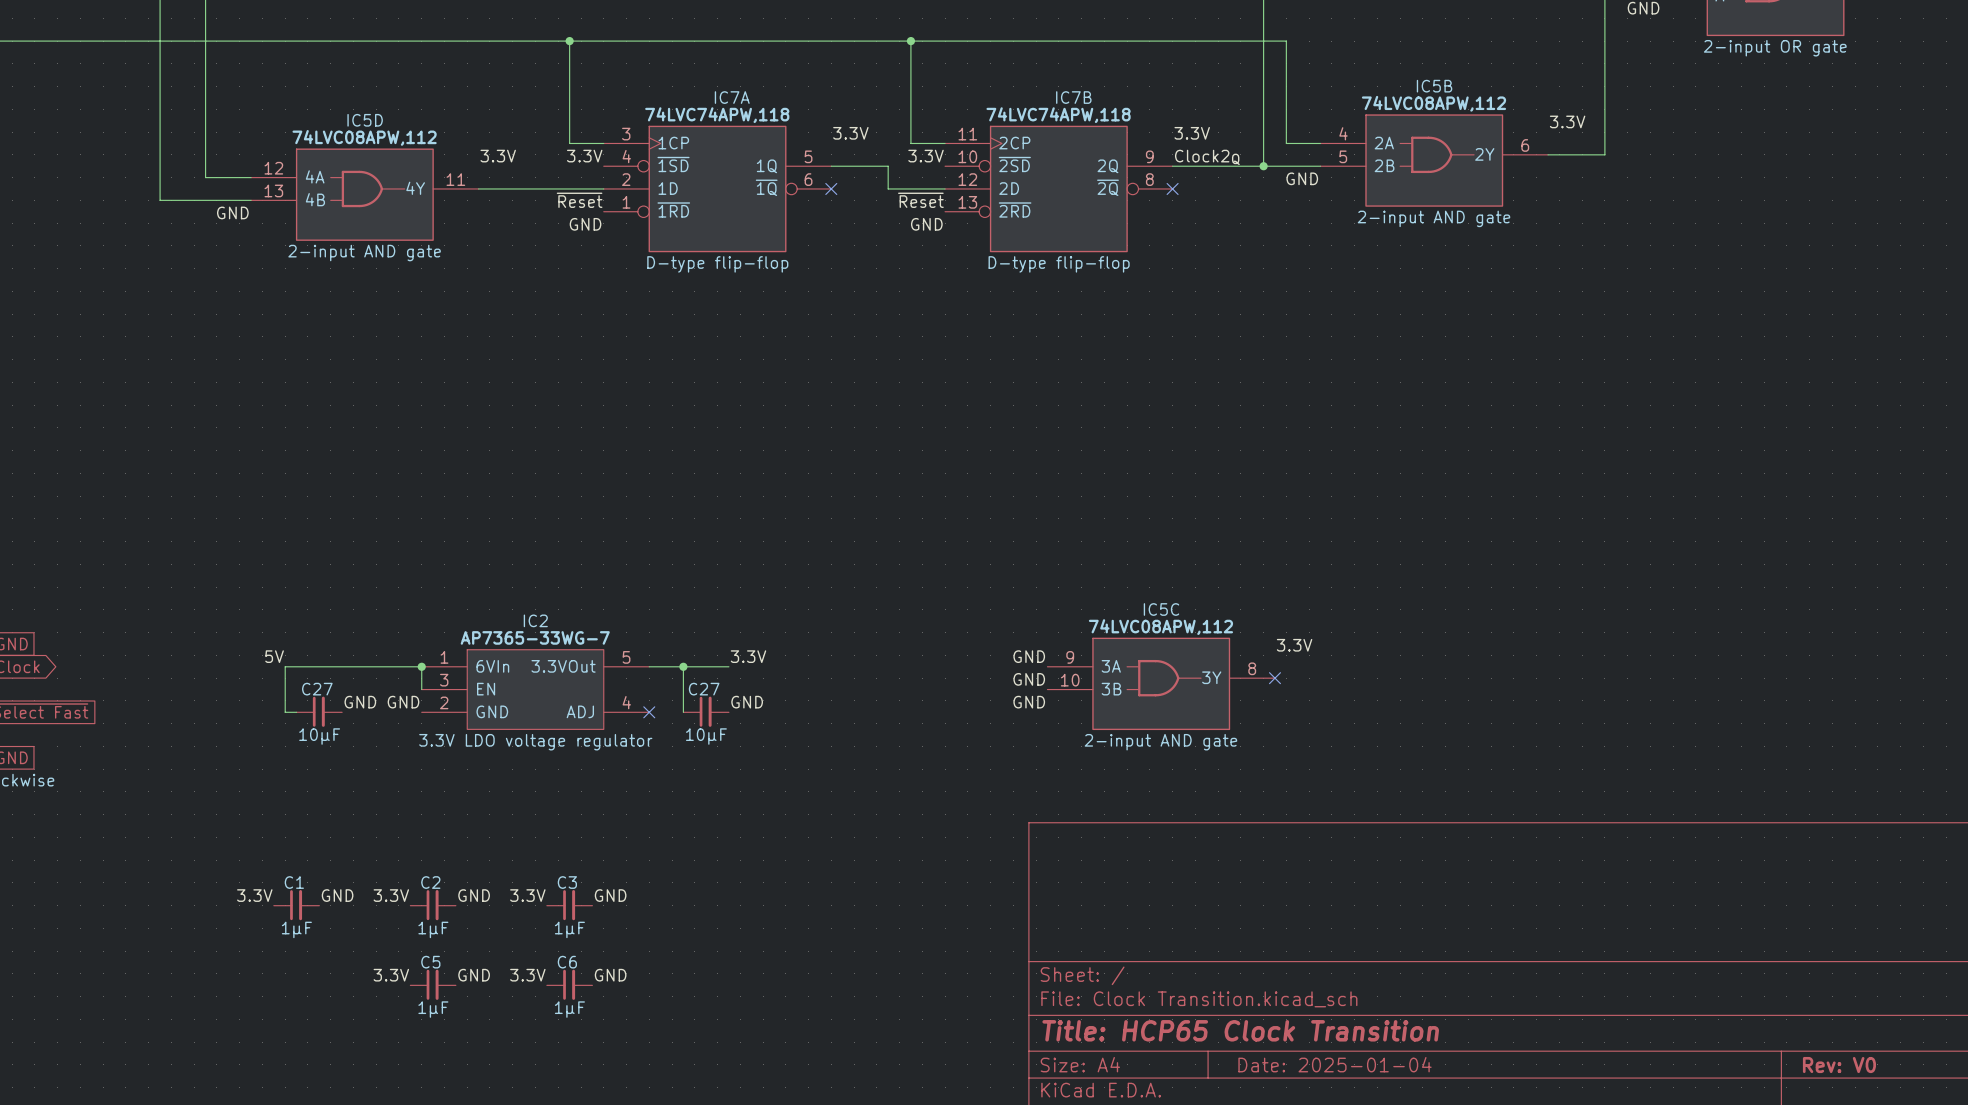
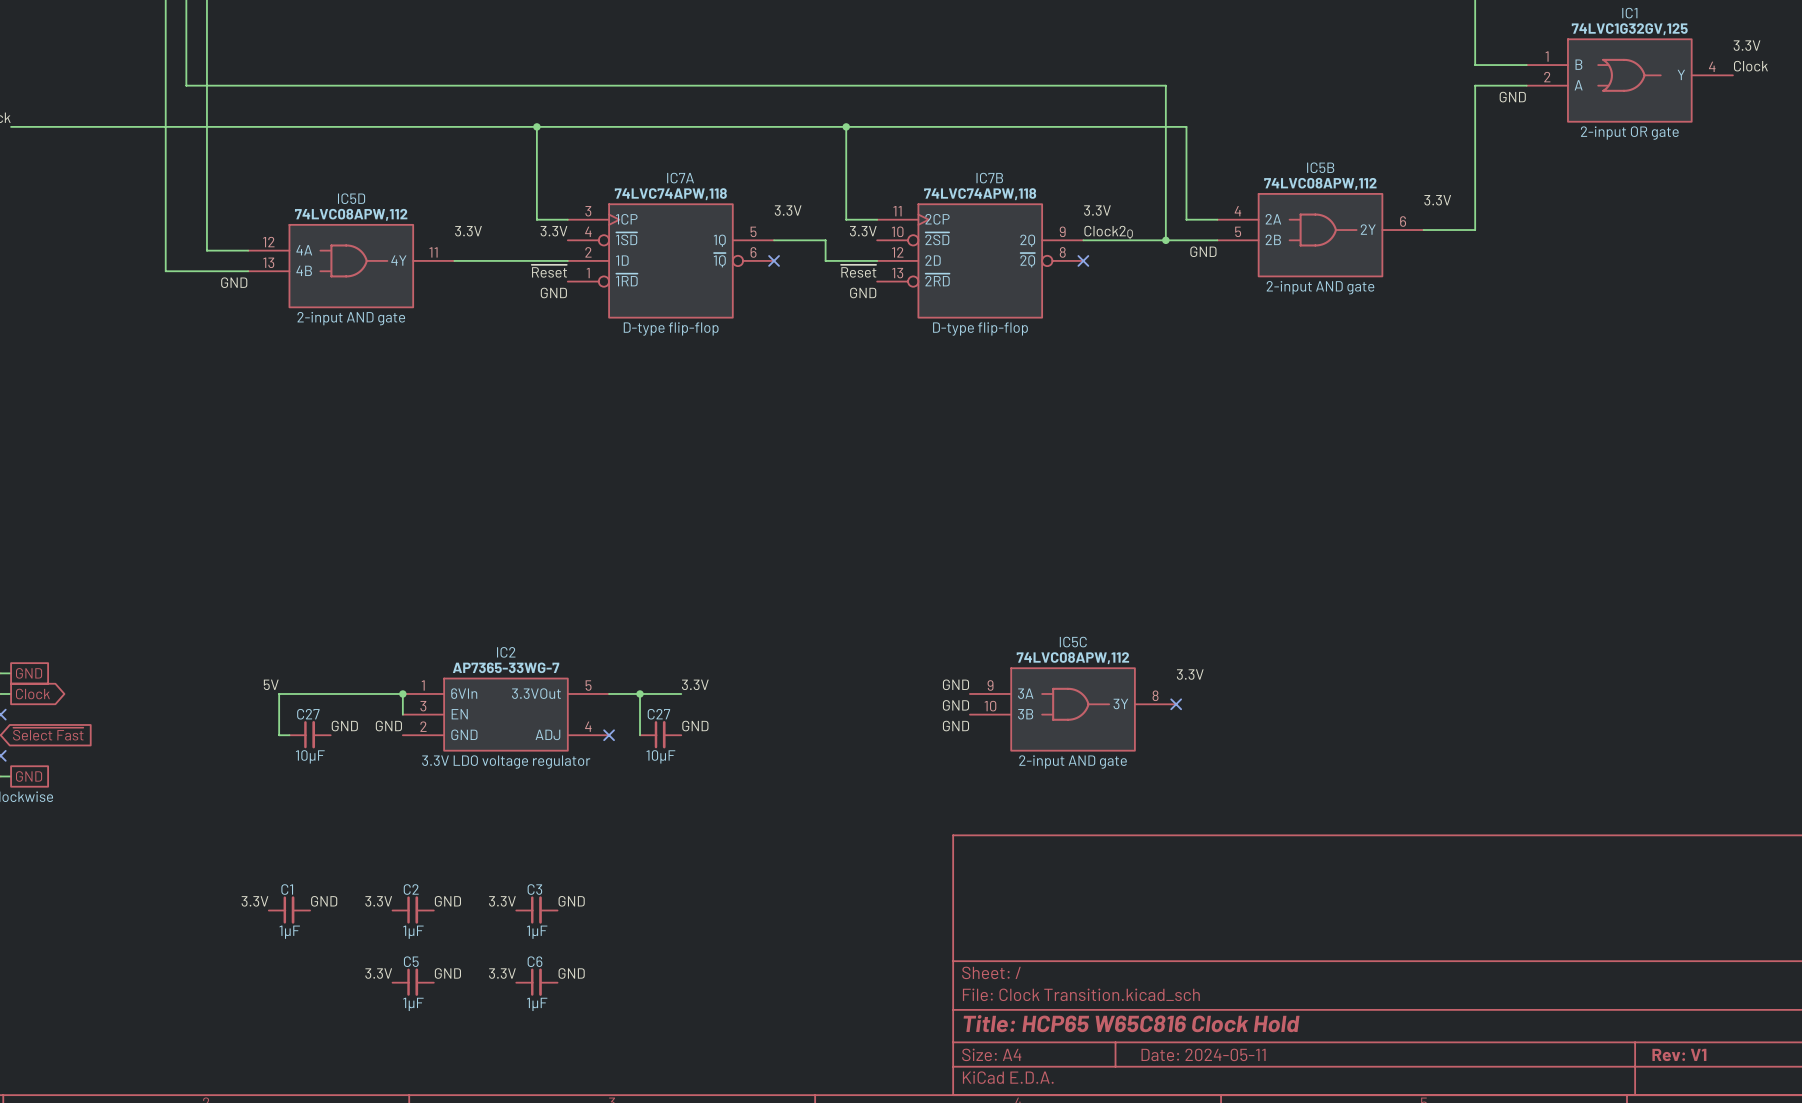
title block: Title: HCP65 Clock Transition (1240, 1030) -> Title: HCP65 W65C816 Clock Hold (1131, 1023)
title block: Date: 2025-01-04 (1335, 1064) -> Date: 2024-05-11 (1203, 1054)
title block: Rev: V0 (1839, 1065) -> Rev: V1 (1679, 1054)

